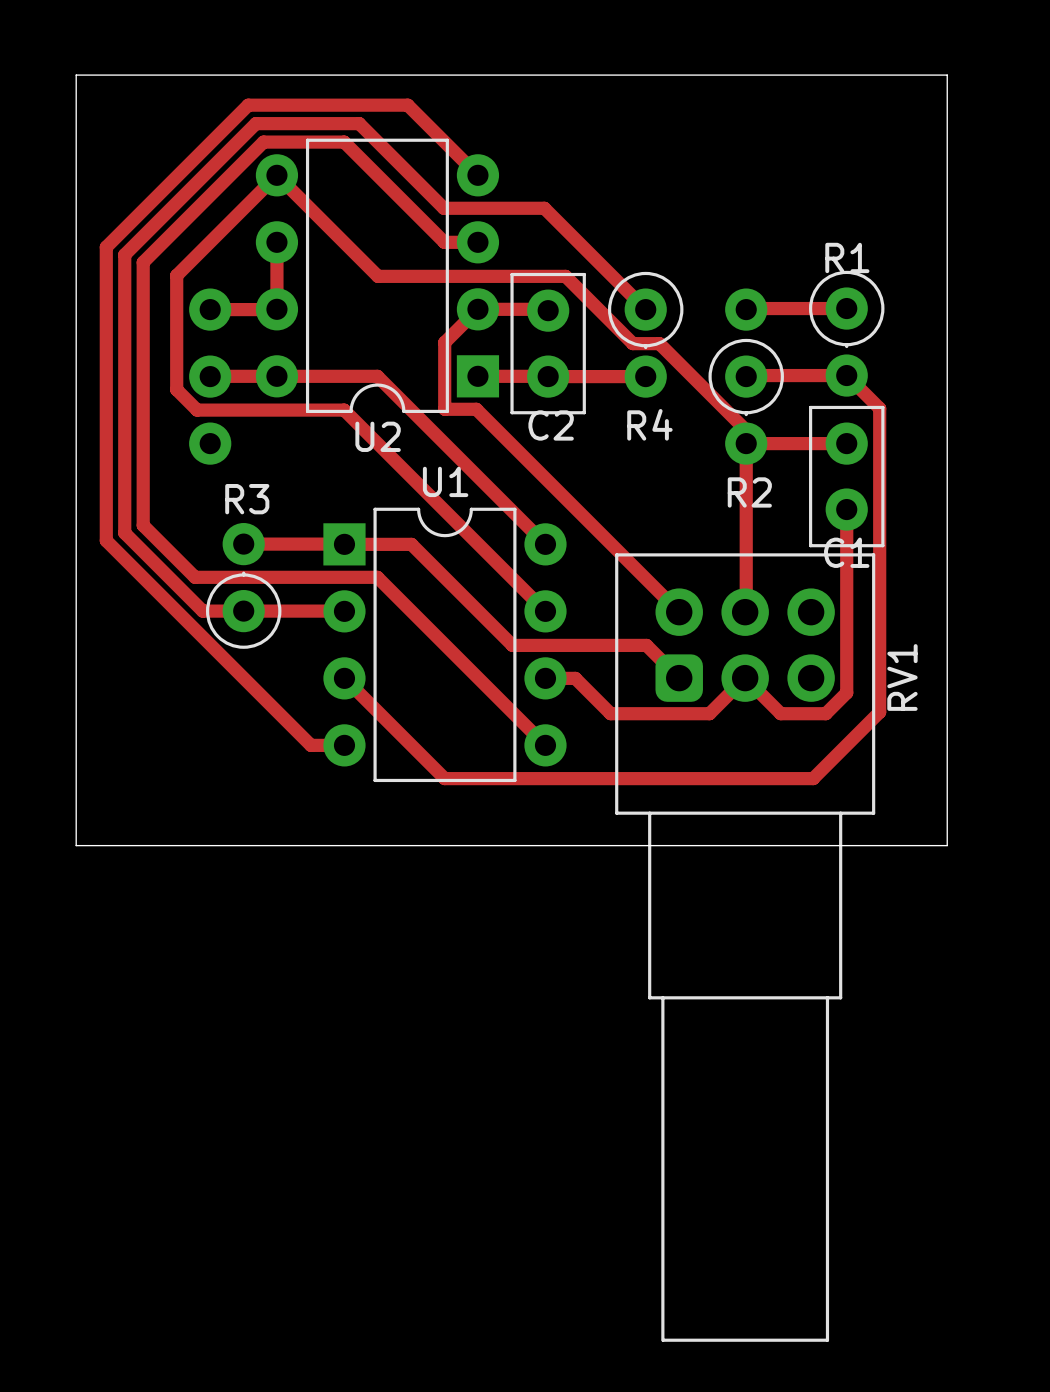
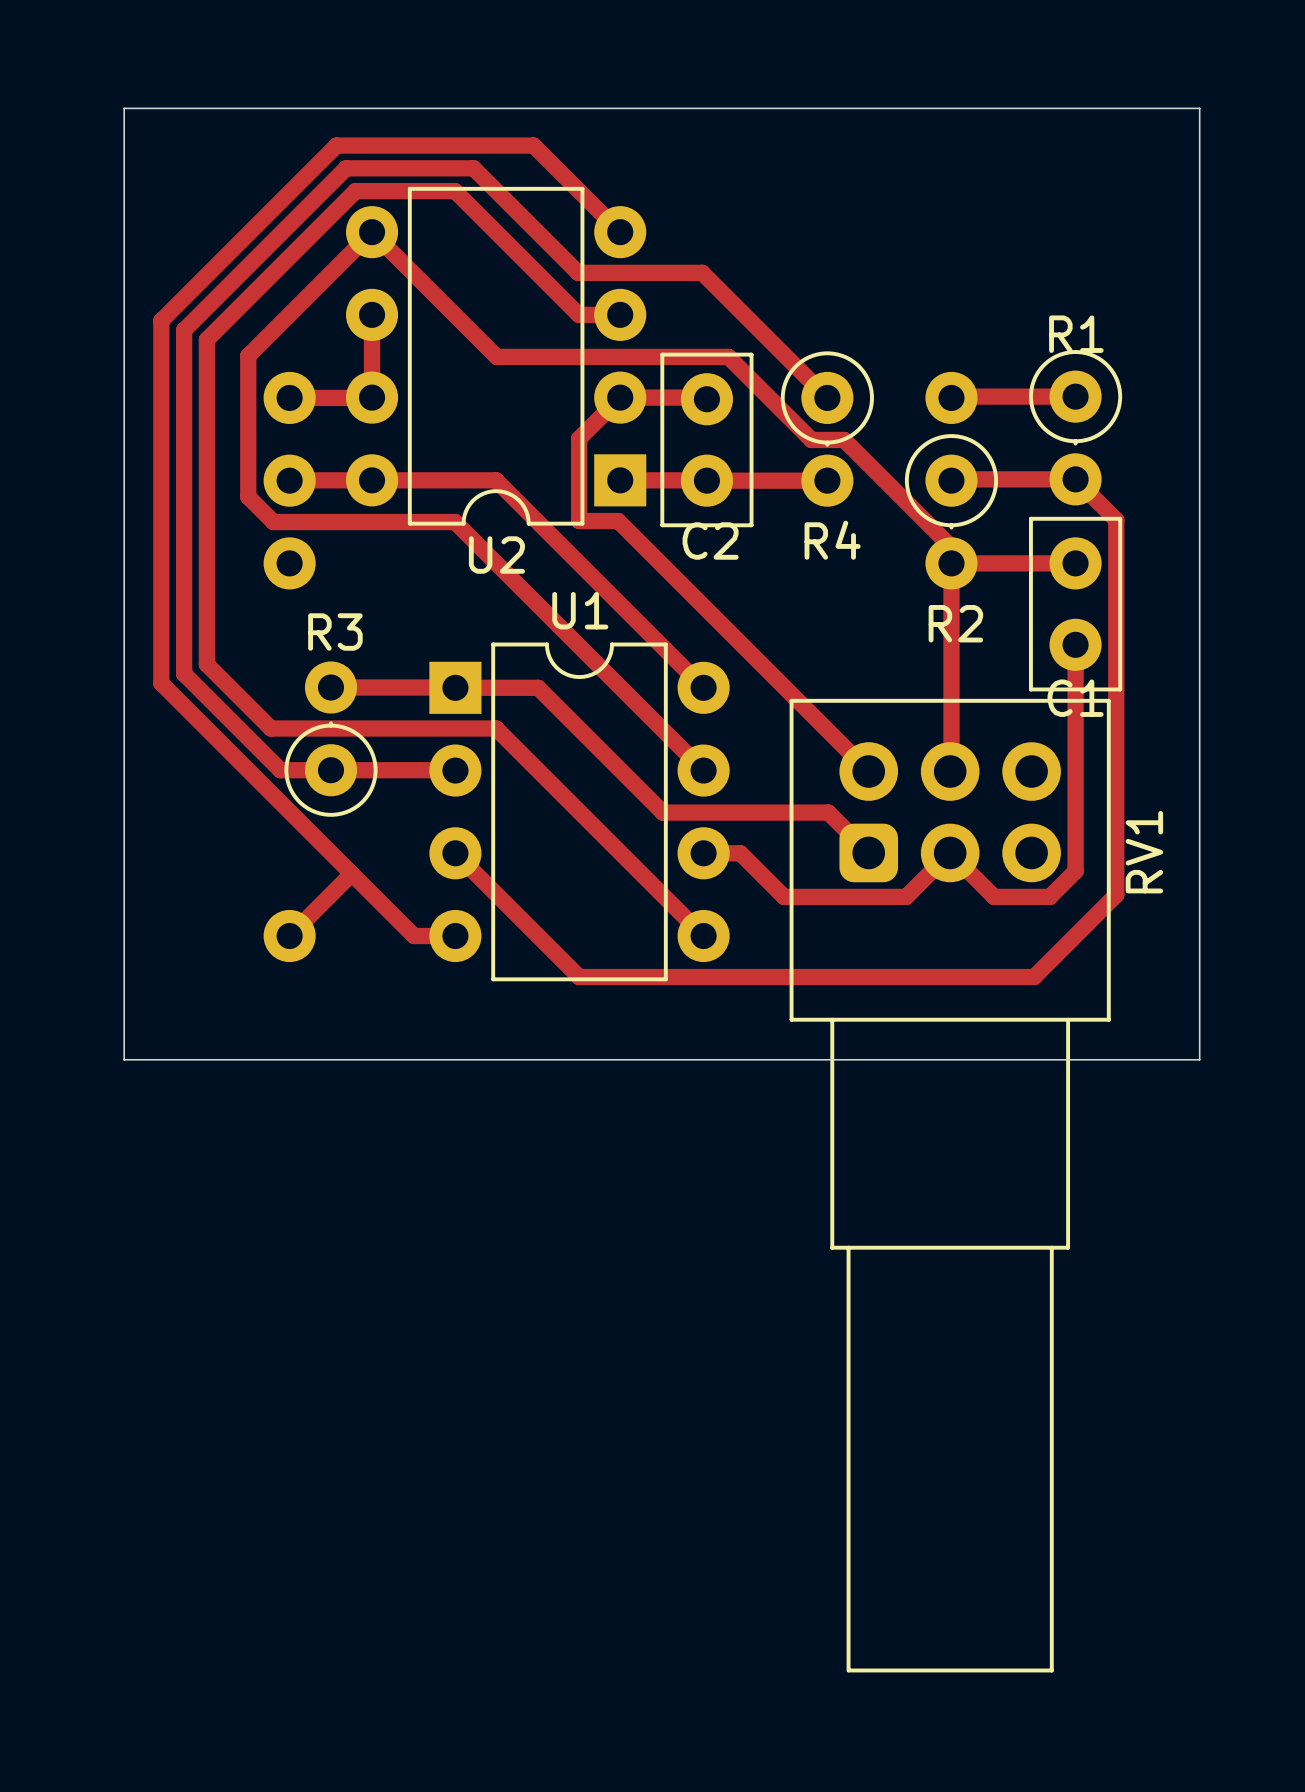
track: none -> (351, 873) (289, 936)
part: none -> (289, 936)

